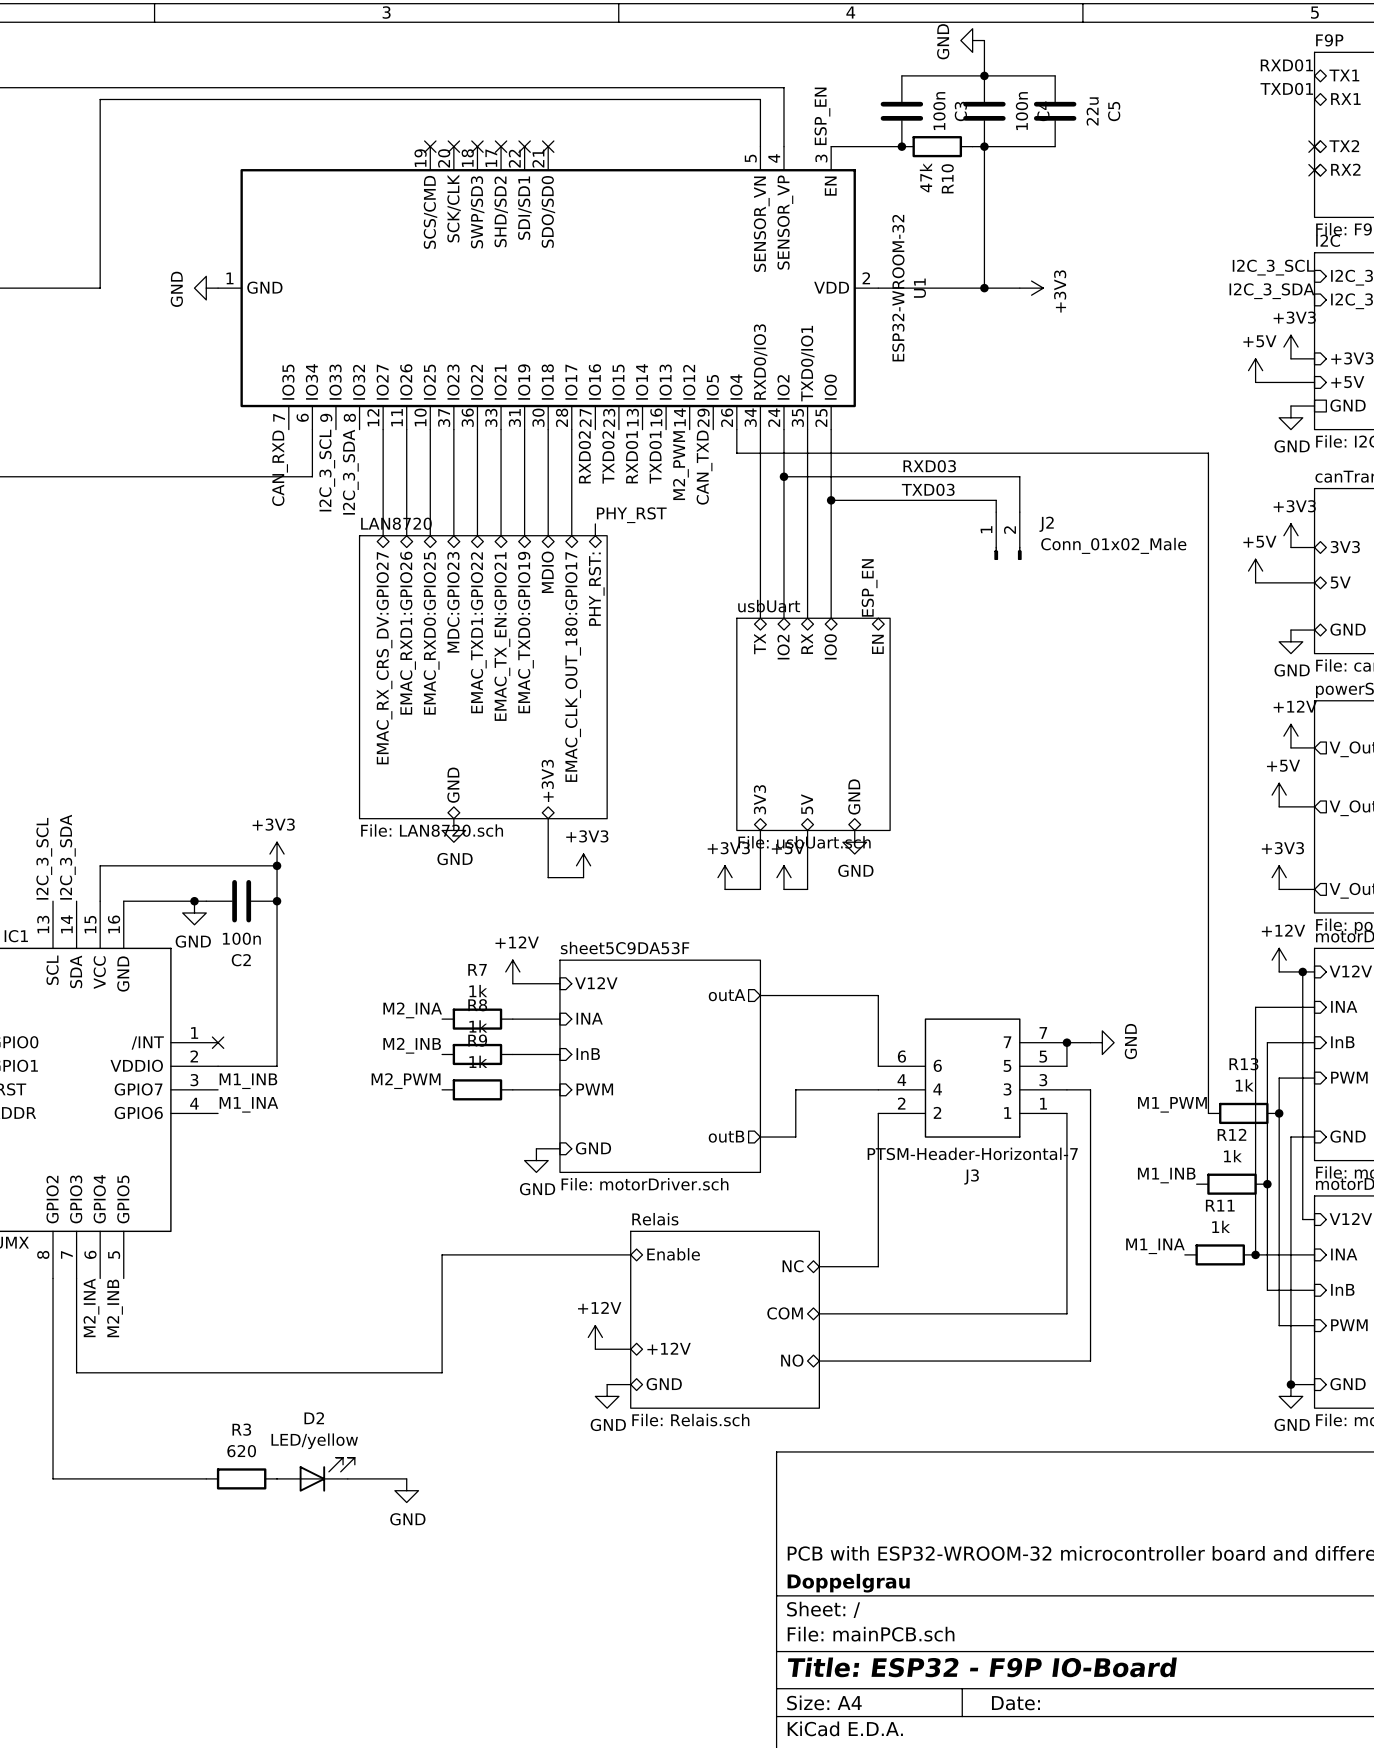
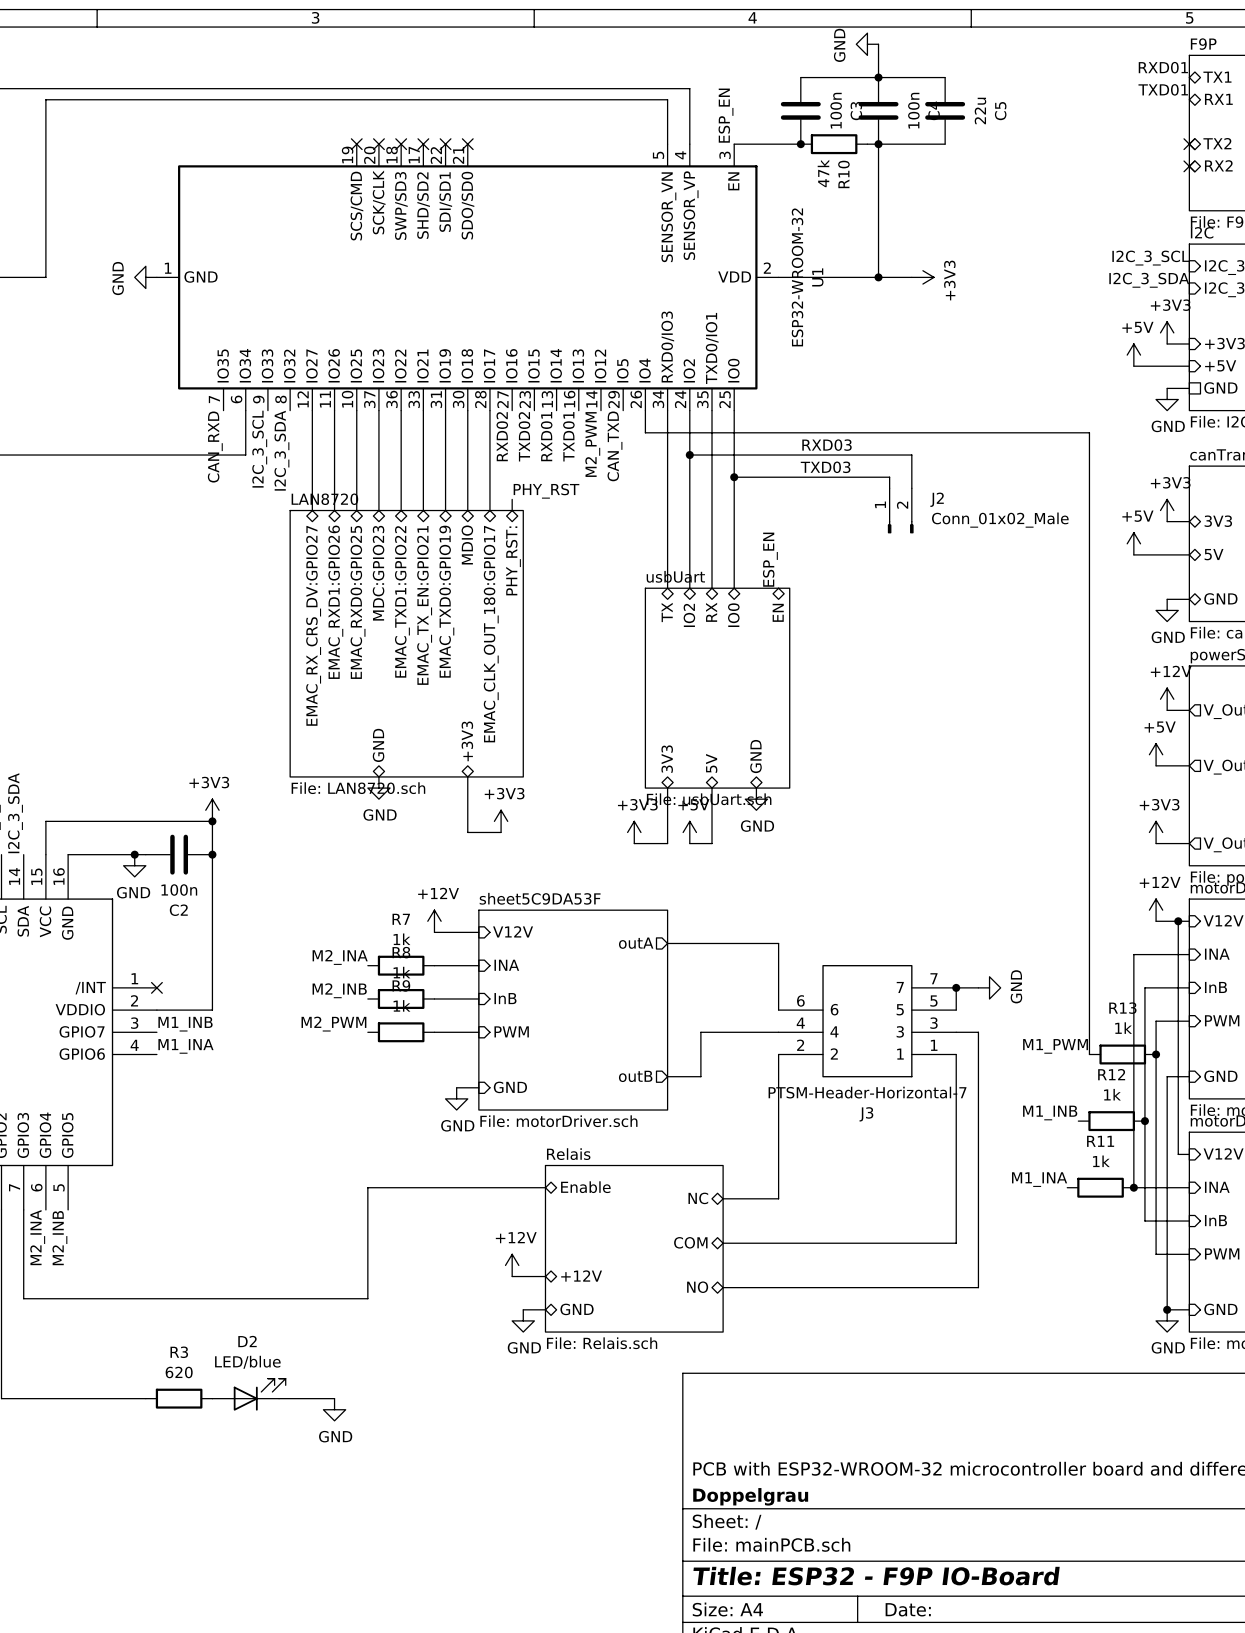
D2 value: LED/yellow (314, 1441) -> LED/blue (247, 1362)

